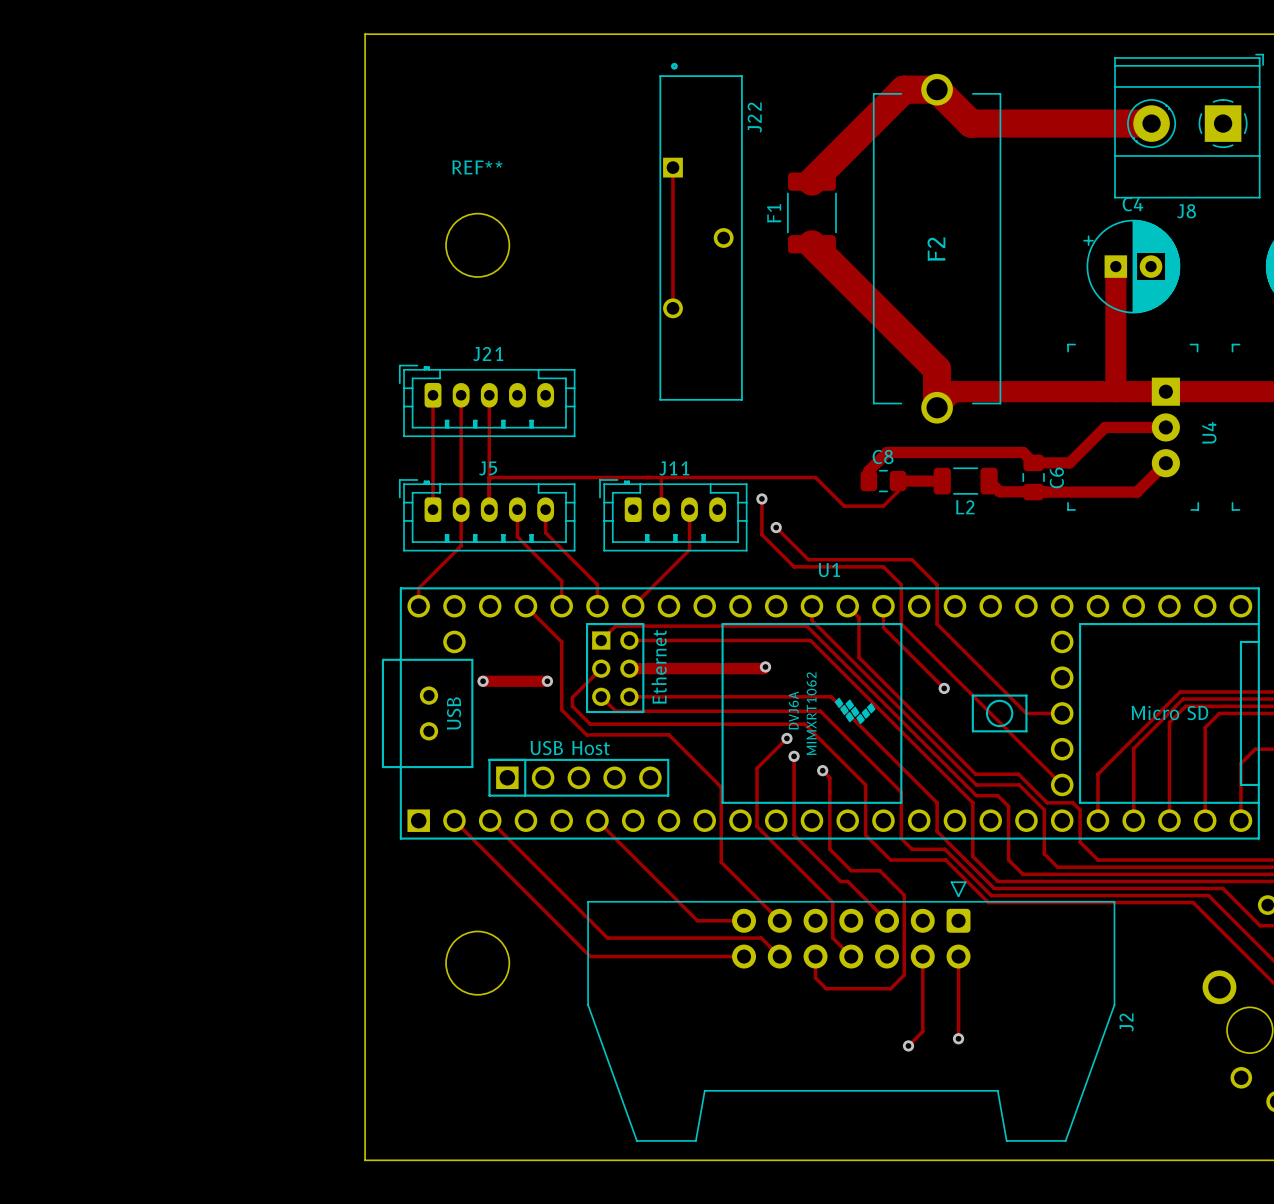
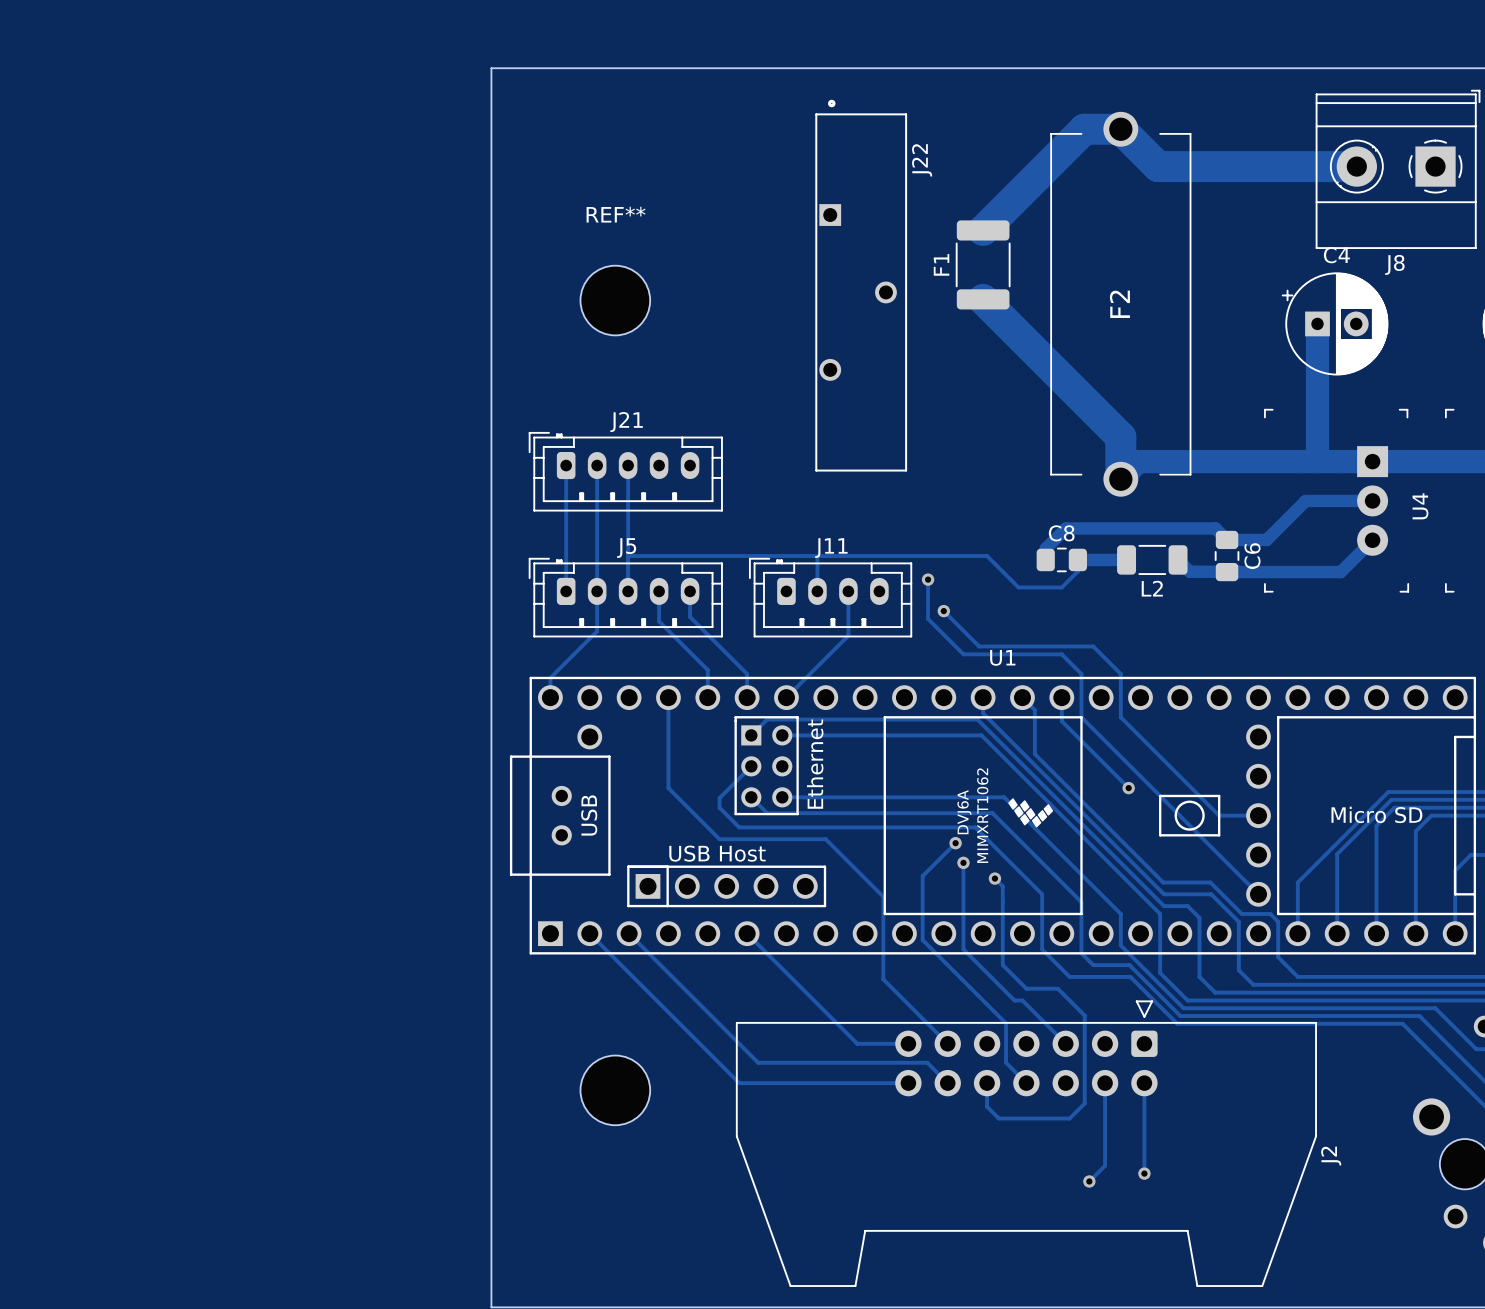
track: (672, 167) (672, 308) -> none
track: (525, 606) (561, 641) (561, 709) (586, 734) -> (668, 697) (668, 788) (719, 839) (735, 839)
track: (765, 666) (763, 668) (629, 668) -> none
via: (765, 666) -> none
track: (483, 681) (547, 681) -> none
via: (483, 681) -> none
via: (547, 681) -> none

